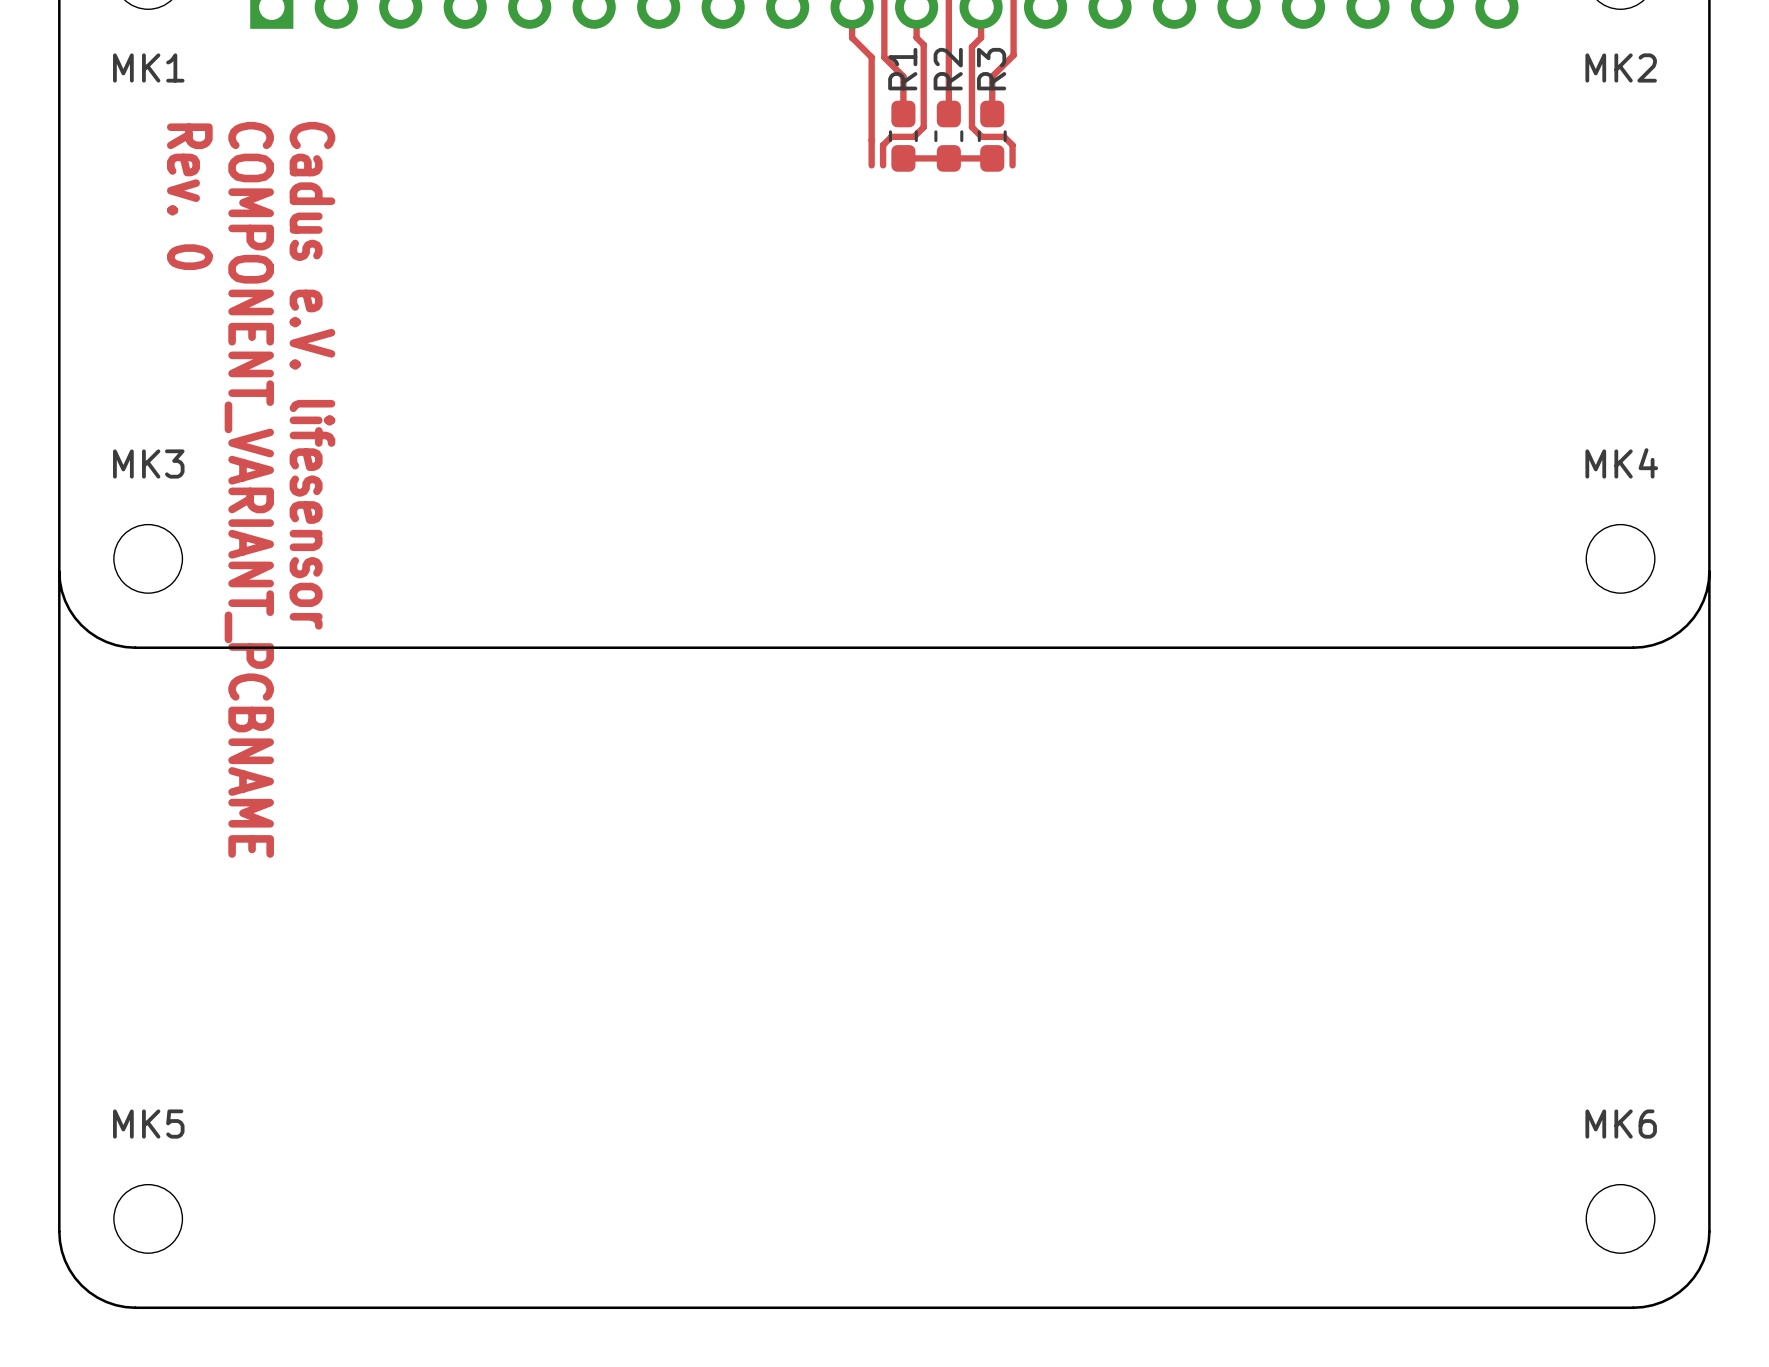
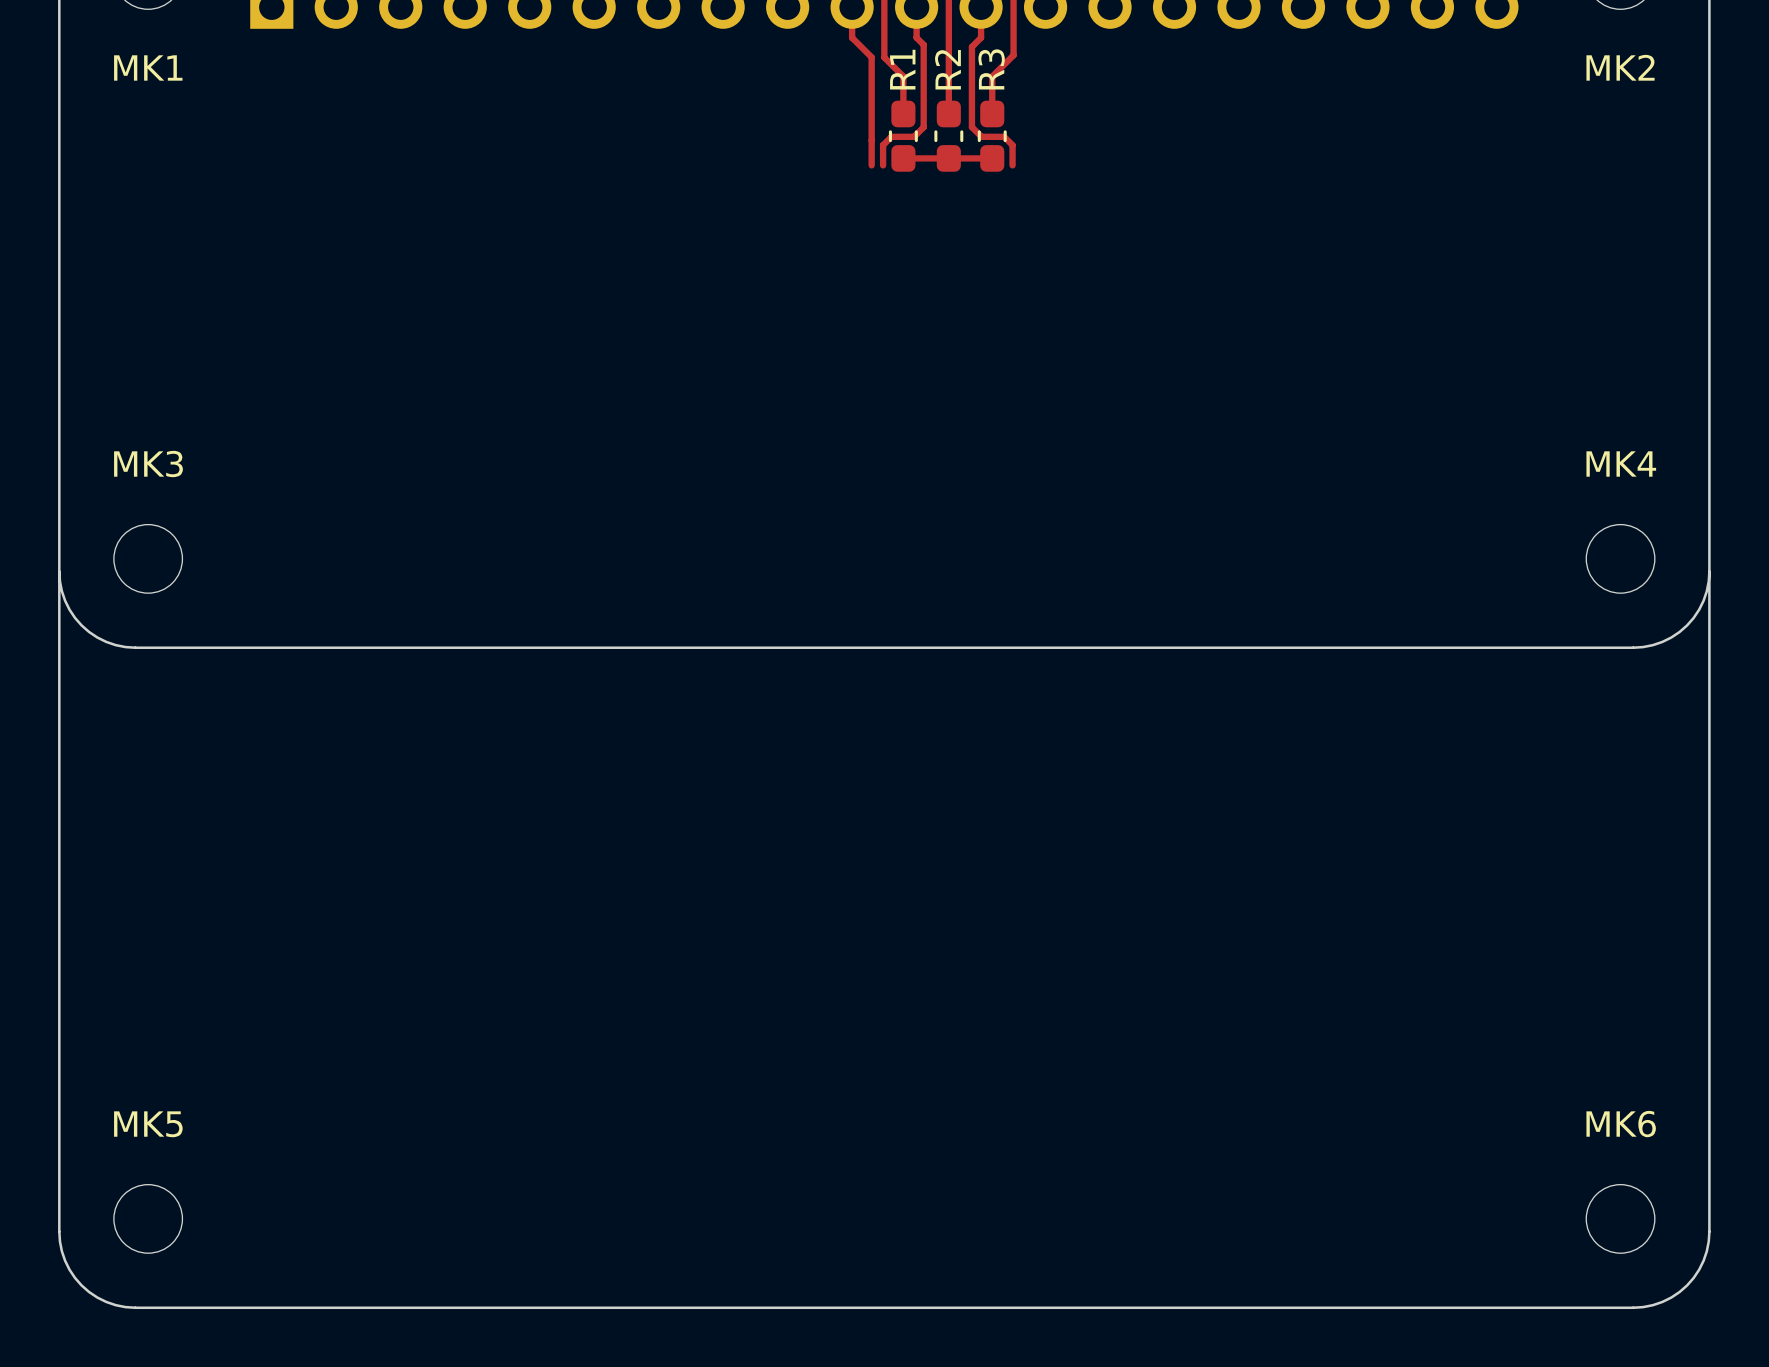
text: Rev. 0 (189, 196) -> none
text: Cadus e.V. lifesensor (312, 375) -> none
text: COMPONENT_VARIANT_PCBNAME (249, 489) -> none

